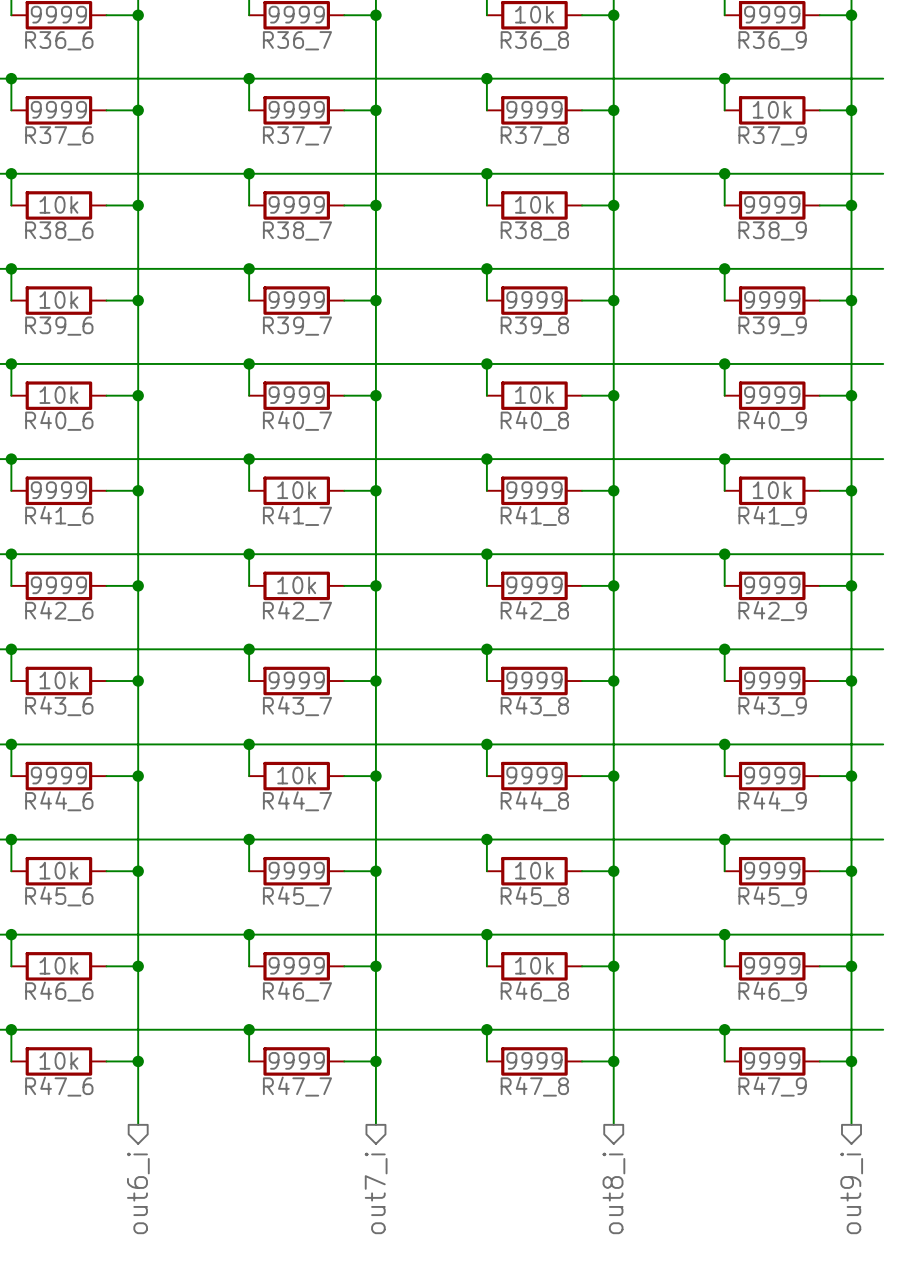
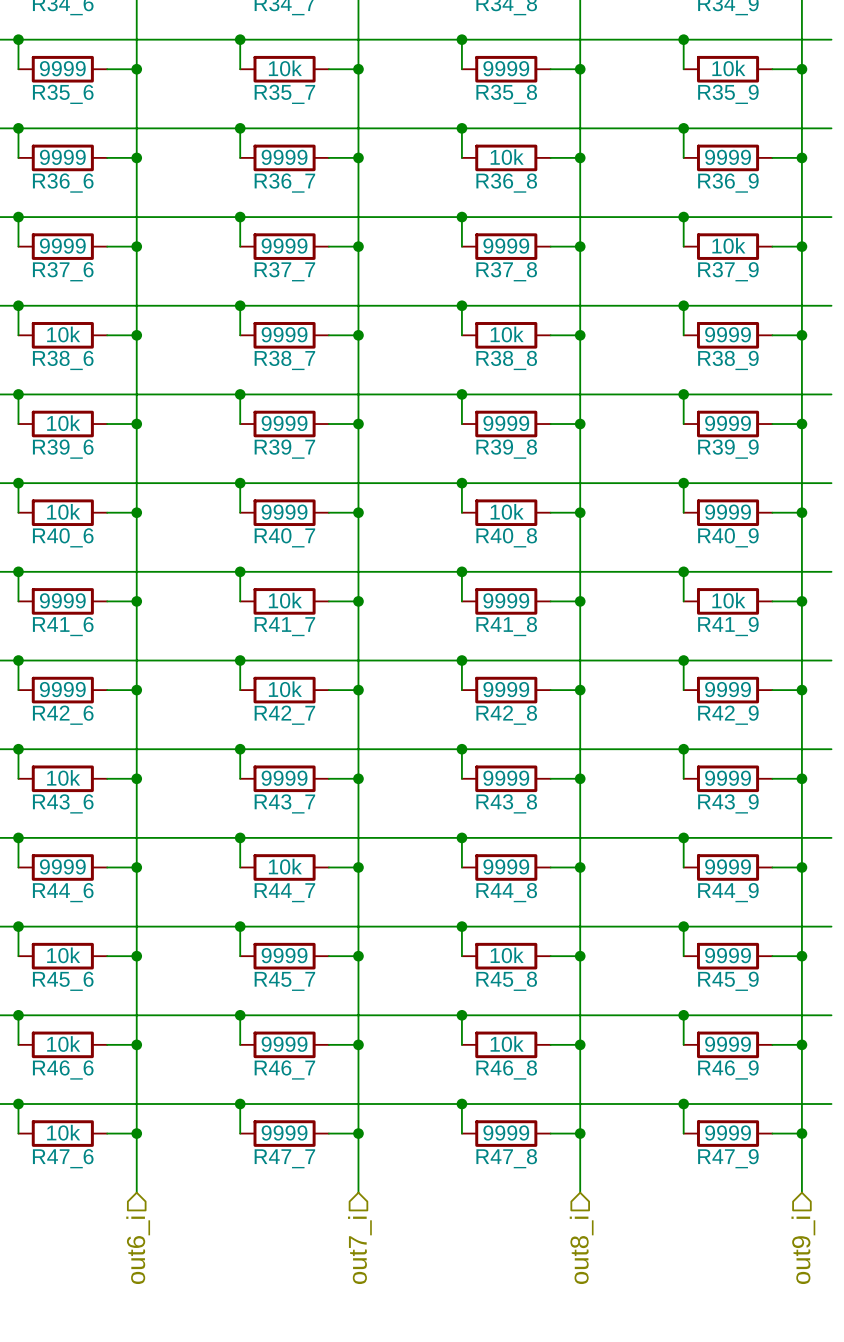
hierarchical label shape: output (138, 1193) -> input (138, 1250)
hierarchical label shape: output (376, 1193) -> input (359, 1250)
hierarchical label shape: output (613, 1193) -> input (581, 1250)
hierarchical label shape: output (851, 1193) -> input (803, 1250)

